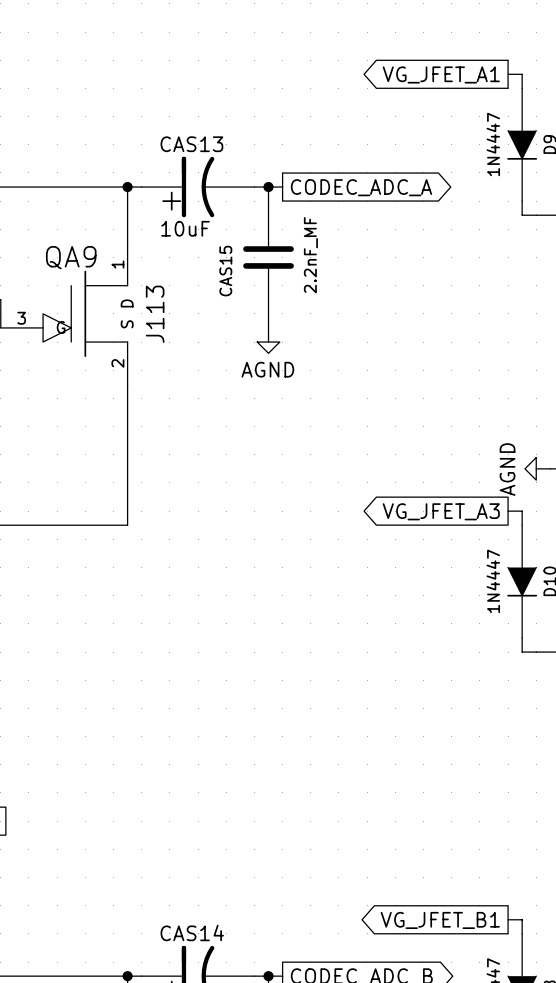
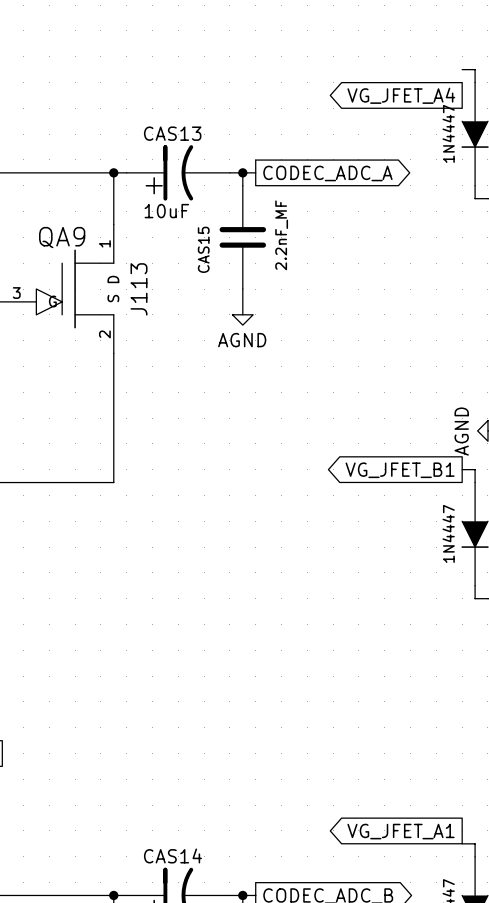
global label: VG_JFET_A1 (441, 74) -> VG_JFET_A4 (401, 95)
global label: VG_JFET_A3 (441, 511) -> VG_JFET_B1 (400, 470)
global label: VG_JFET_B1 (440, 920) -> VG_JFET_A1 (401, 831)

